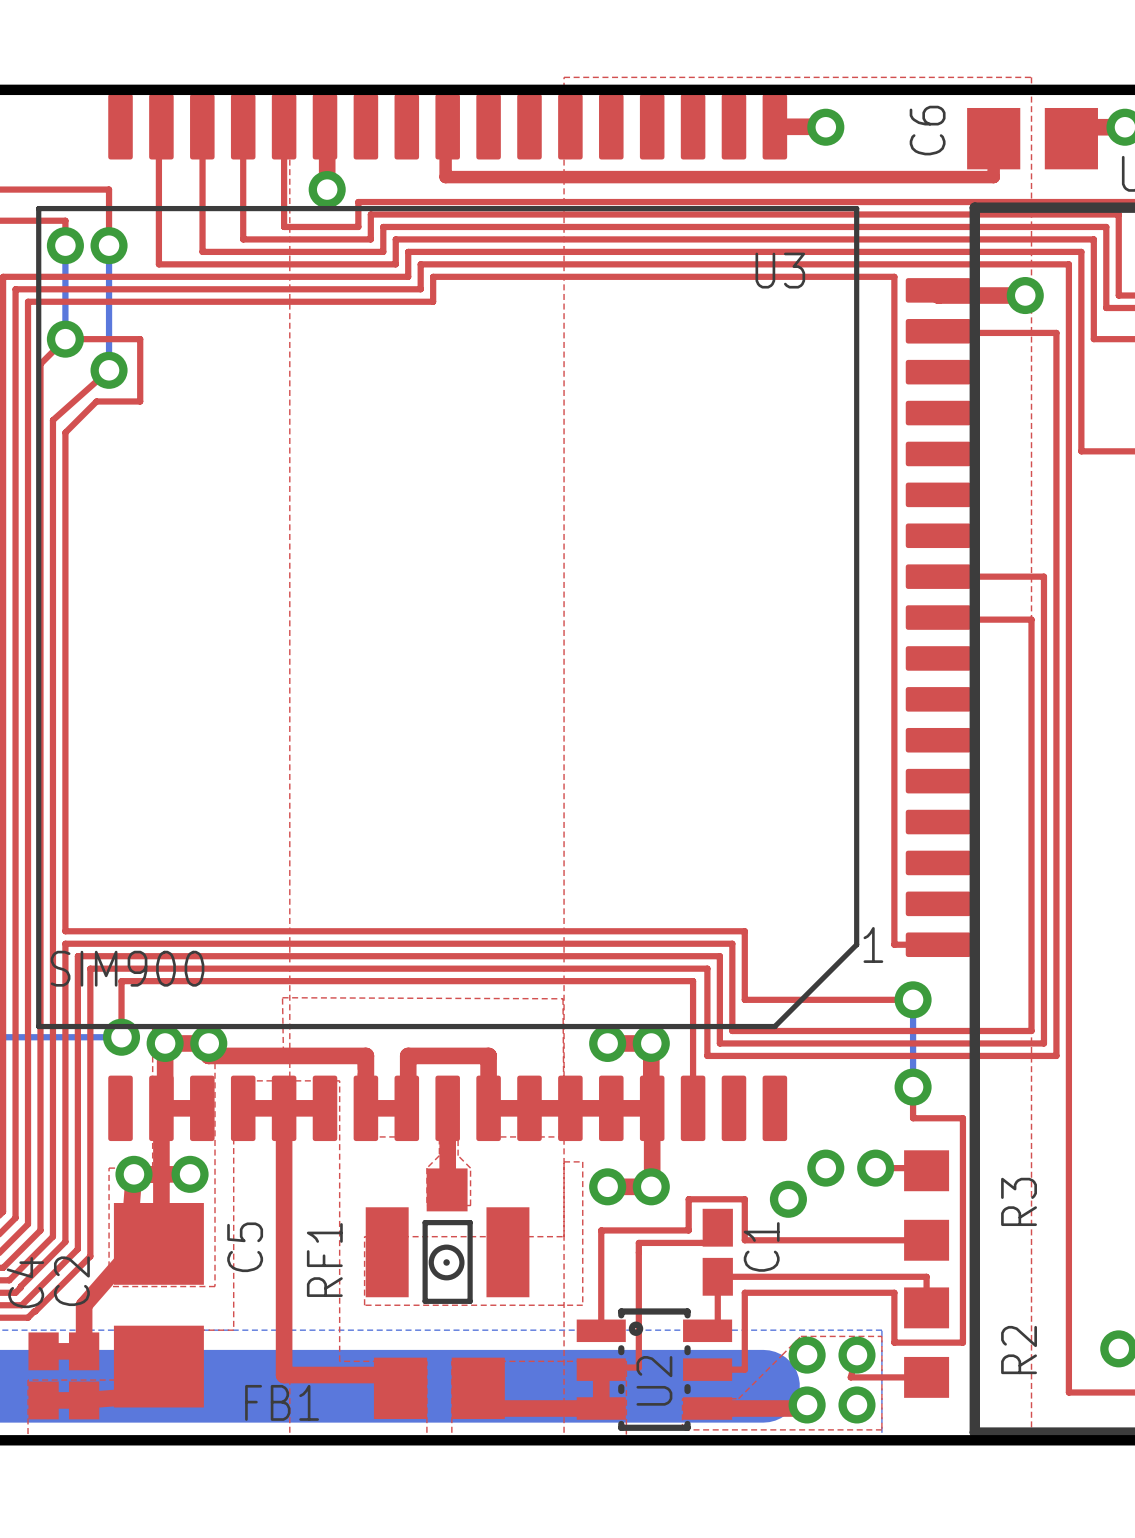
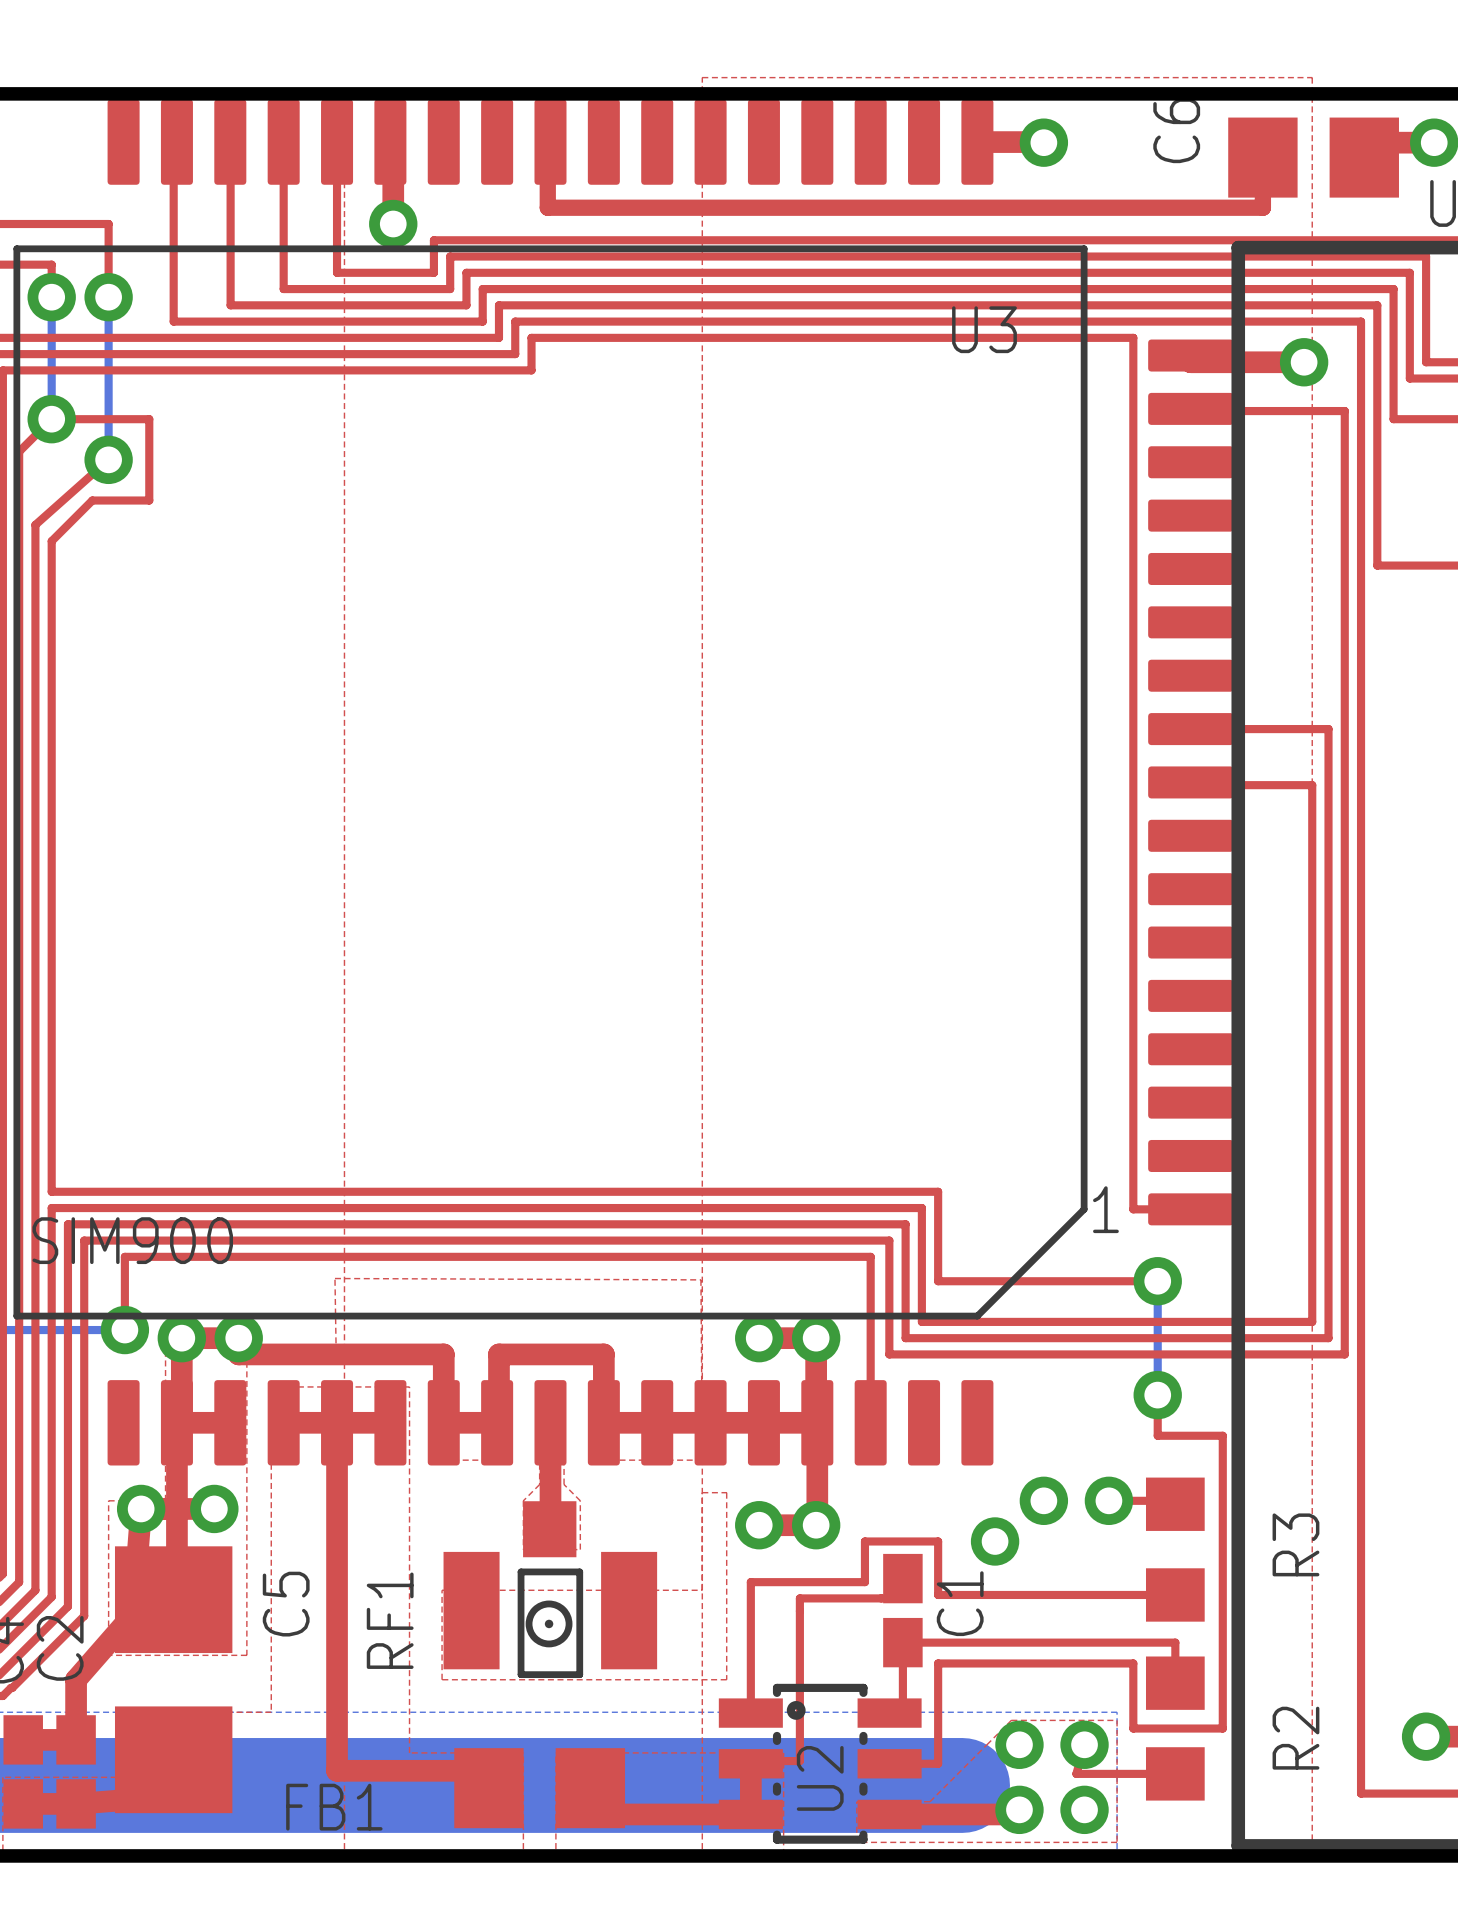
C6 name position: C6 (927, 130) -> C6 (1176, 130)

